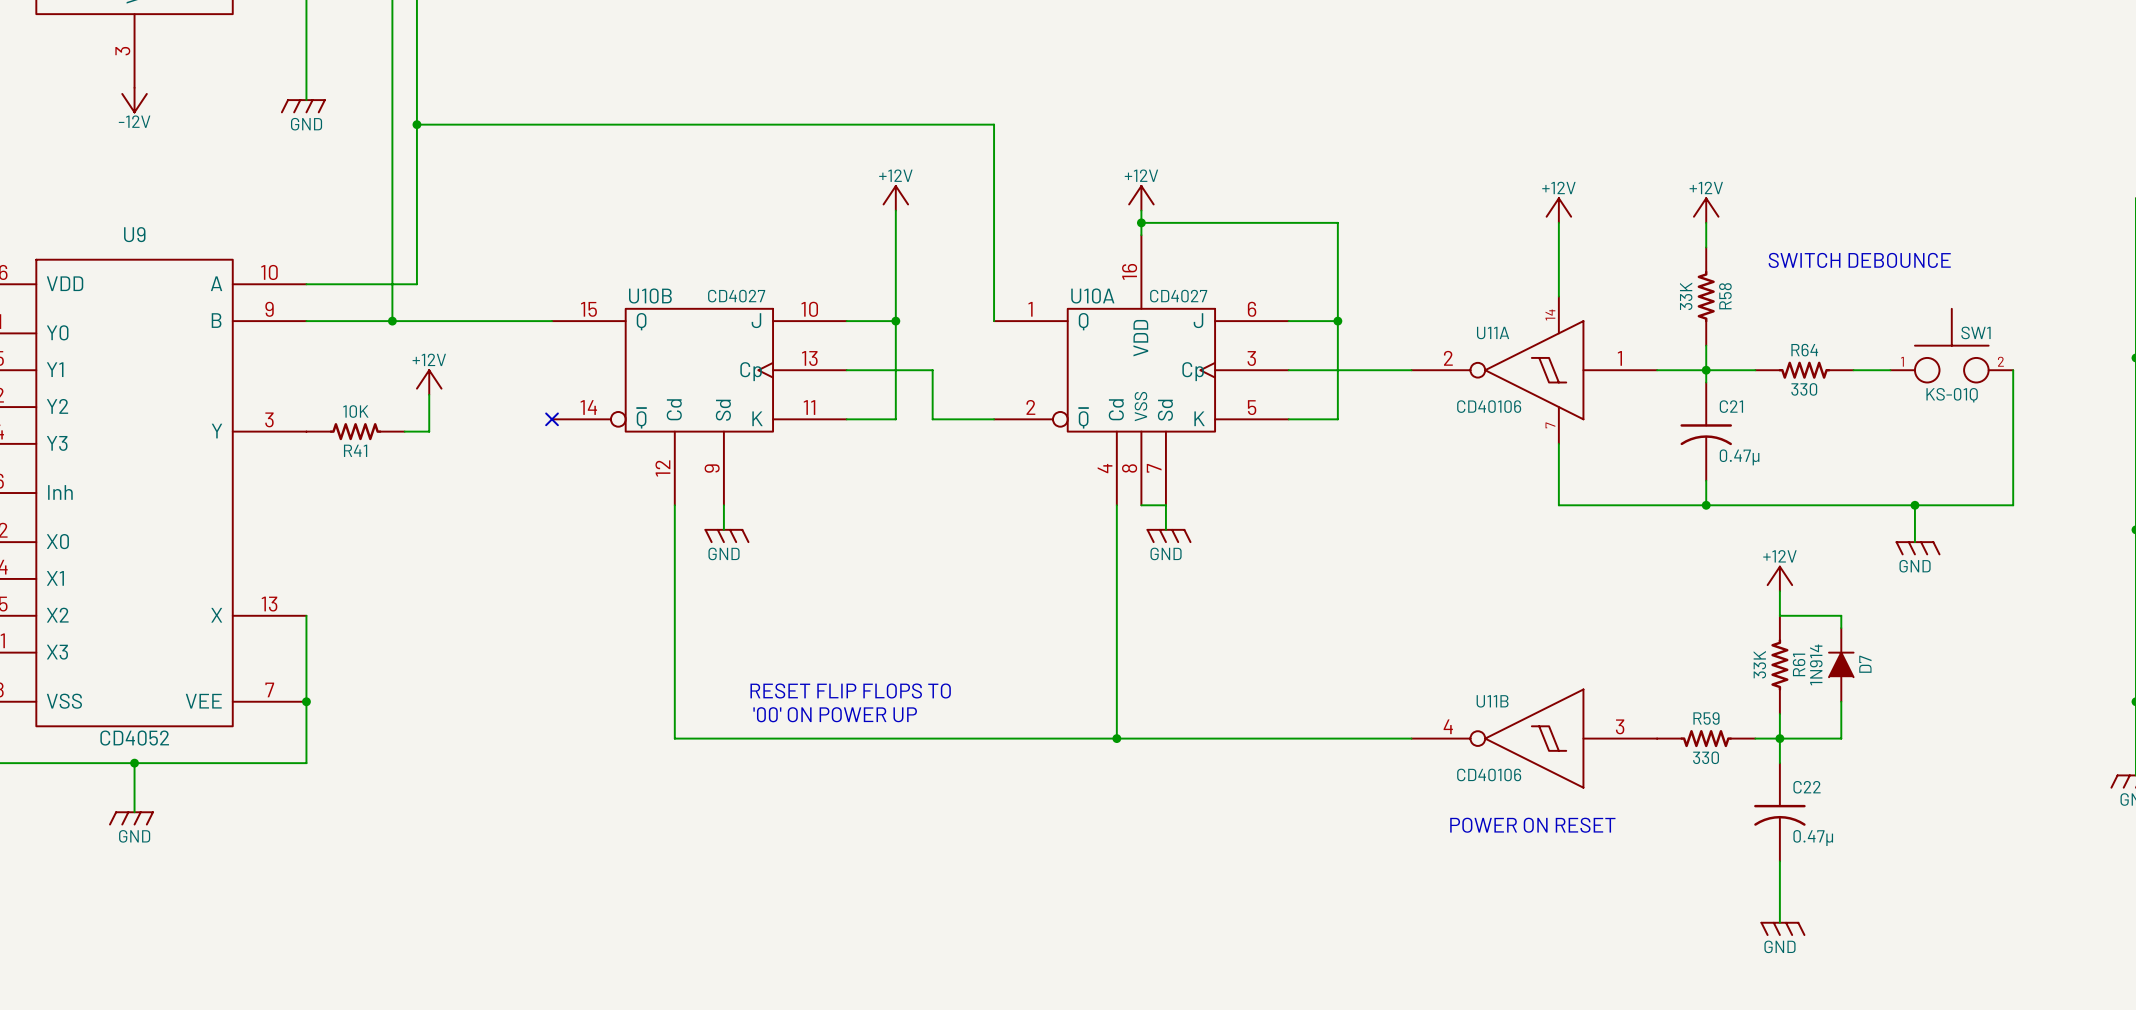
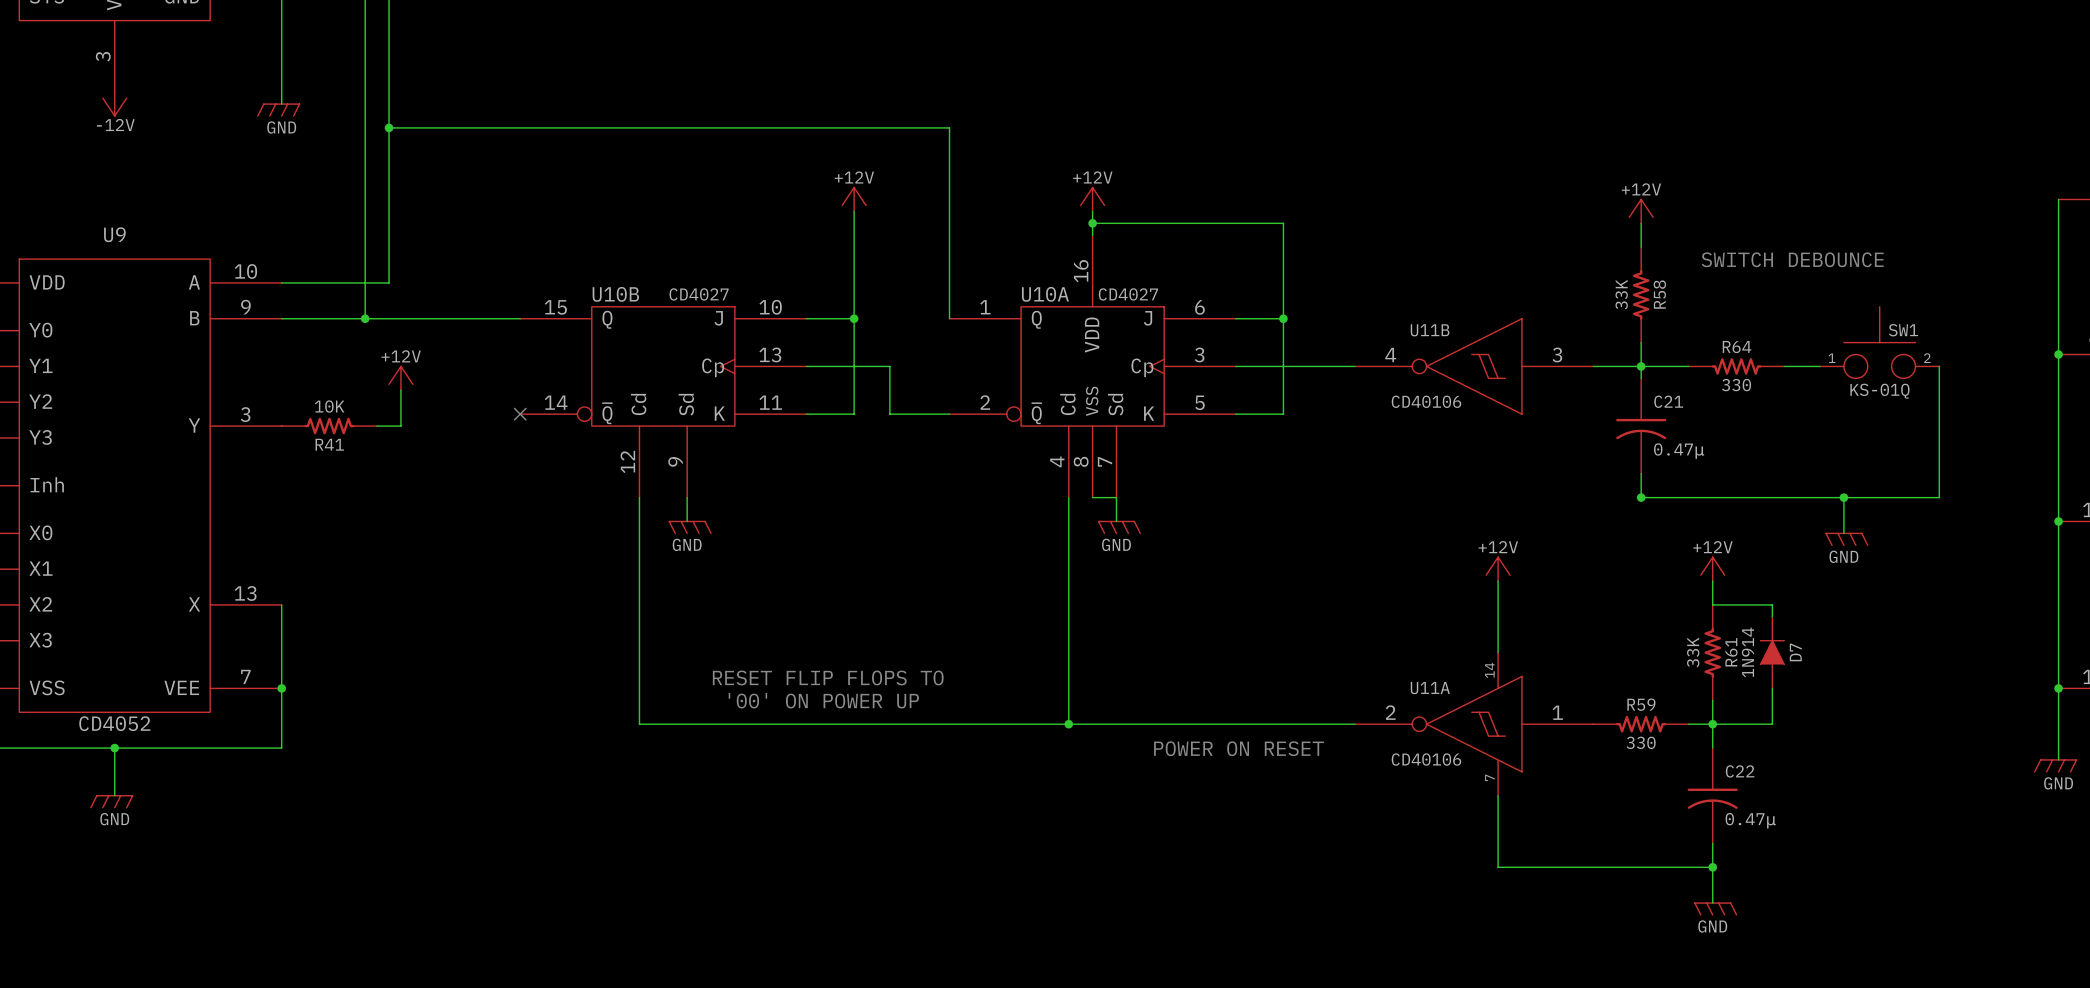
power symbol: +12V (1558, 210) -> none
wire: (1558, 222) (1558, 296) -> none
U11A position: (1534, 370) -> (1474, 724)
wire: (1558, 443) (1558, 505) (1706, 505) -> none
power symbol: none -> +12V (1498, 569)
wire: none -> (1498, 581) (1498, 652)
U11B position: (1534, 738) -> (1474, 366)
text: none -> POWER ON RESET (1239, 748)
wire: none -> (1498, 795) (1498, 867) (1712, 867)
text: POWER ON RESET (1532, 825) -> none
junction: none -> (1712, 867)

